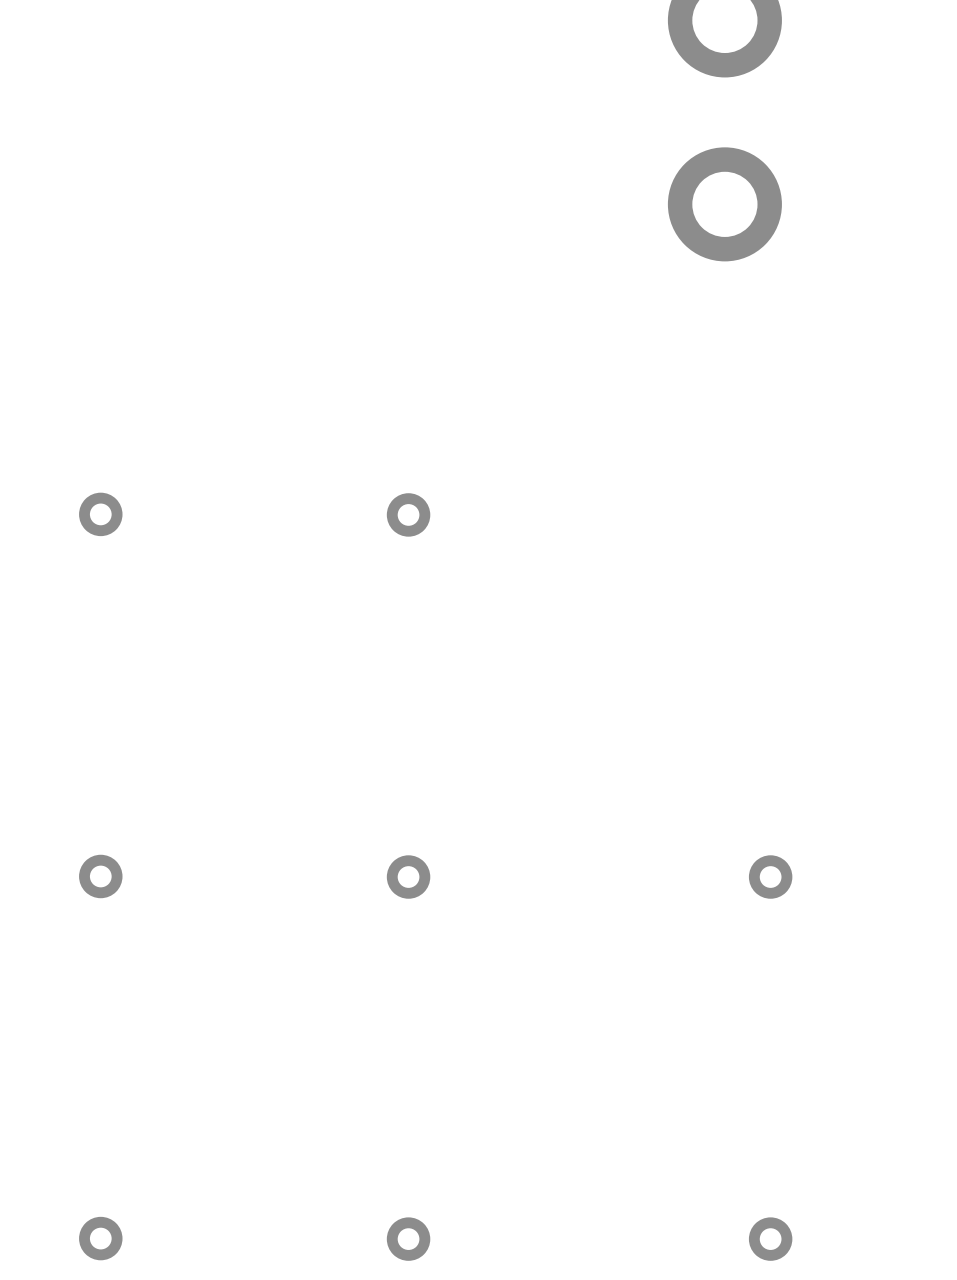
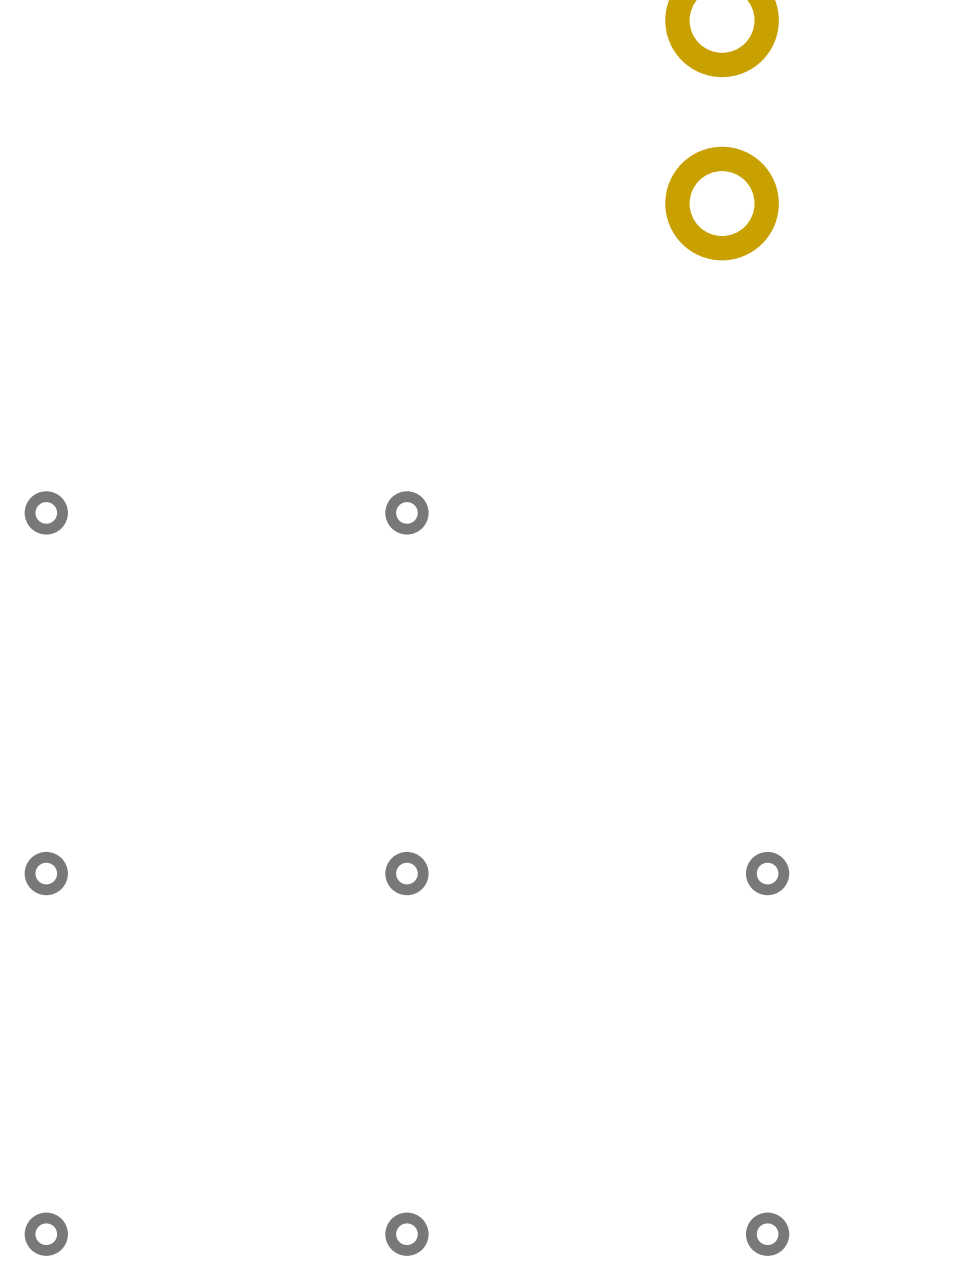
via position: (100, 514) -> (46, 512)
via position: (100, 876) -> (46, 873)
via position: (100, 1238) -> (46, 1234)

